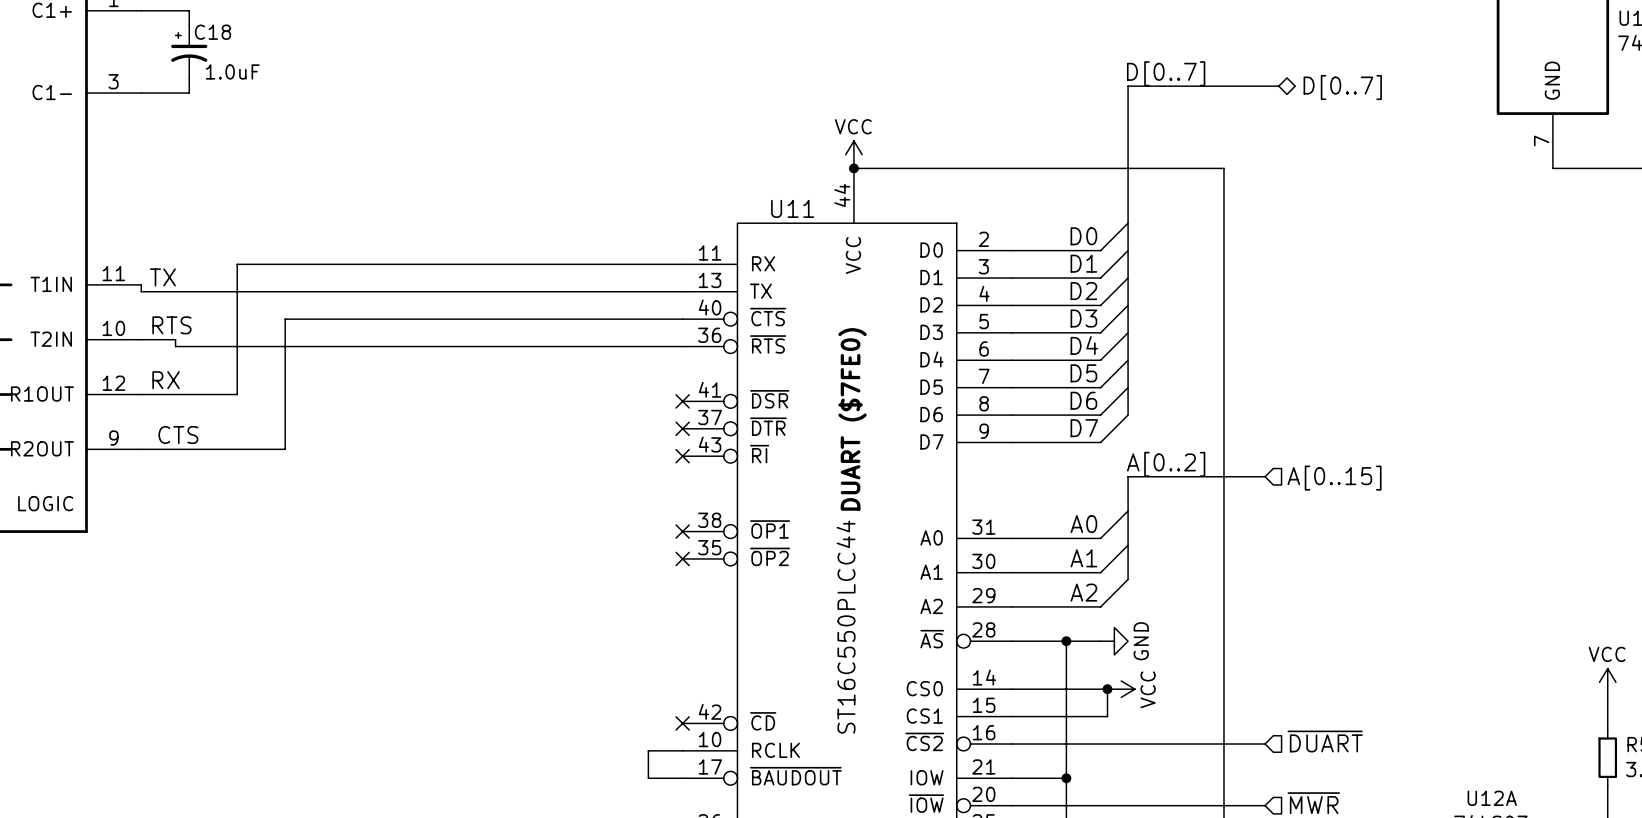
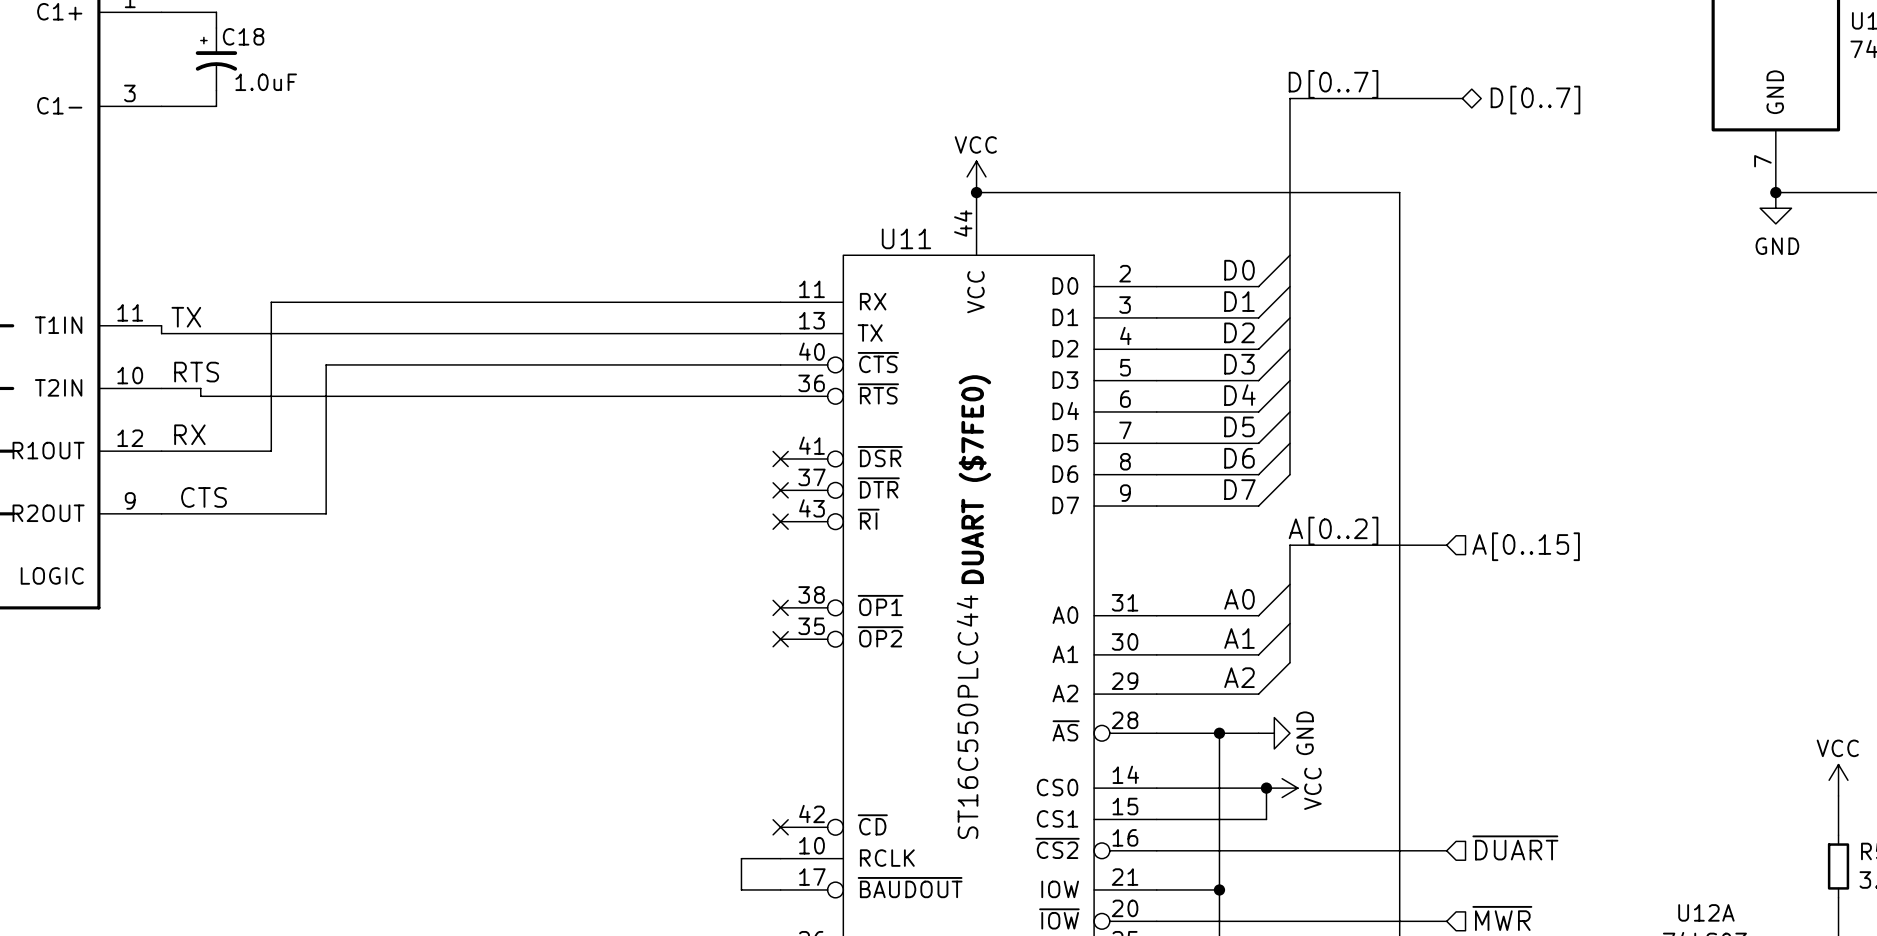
junction: none -> (1775, 192)
power symbol: none -> GND (1775, 208)

